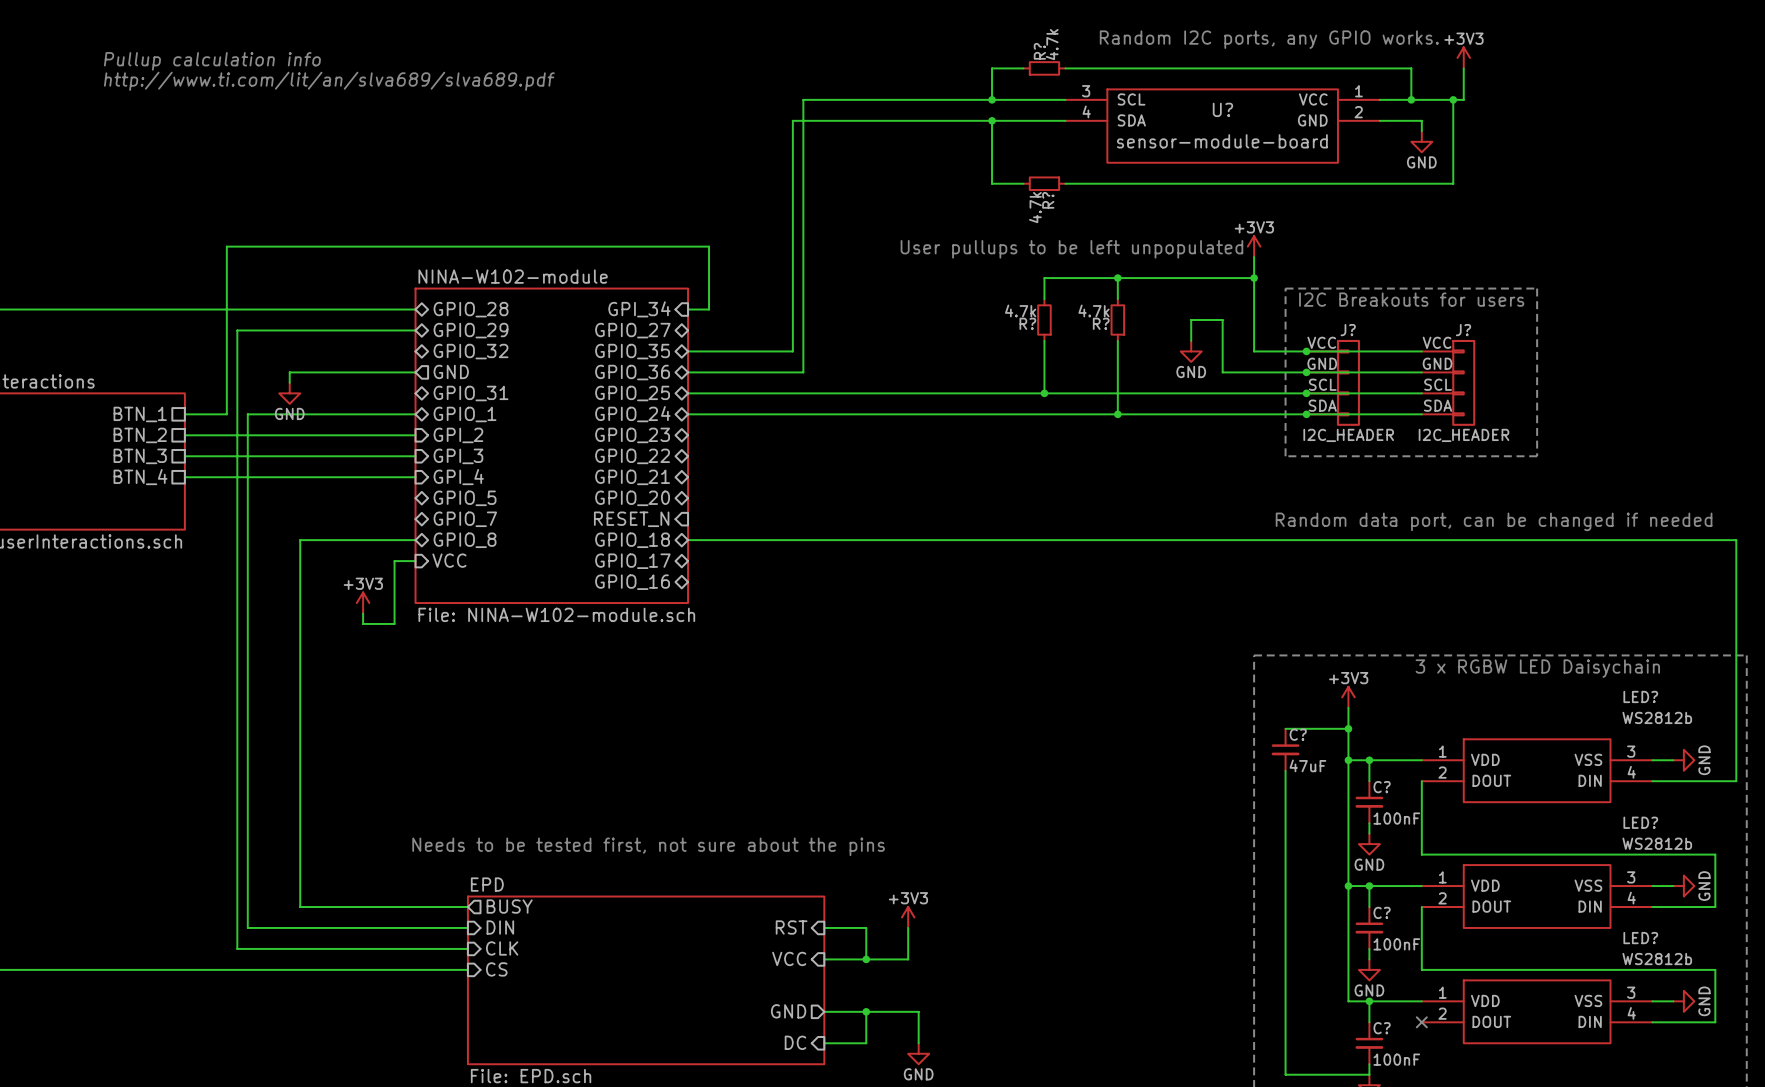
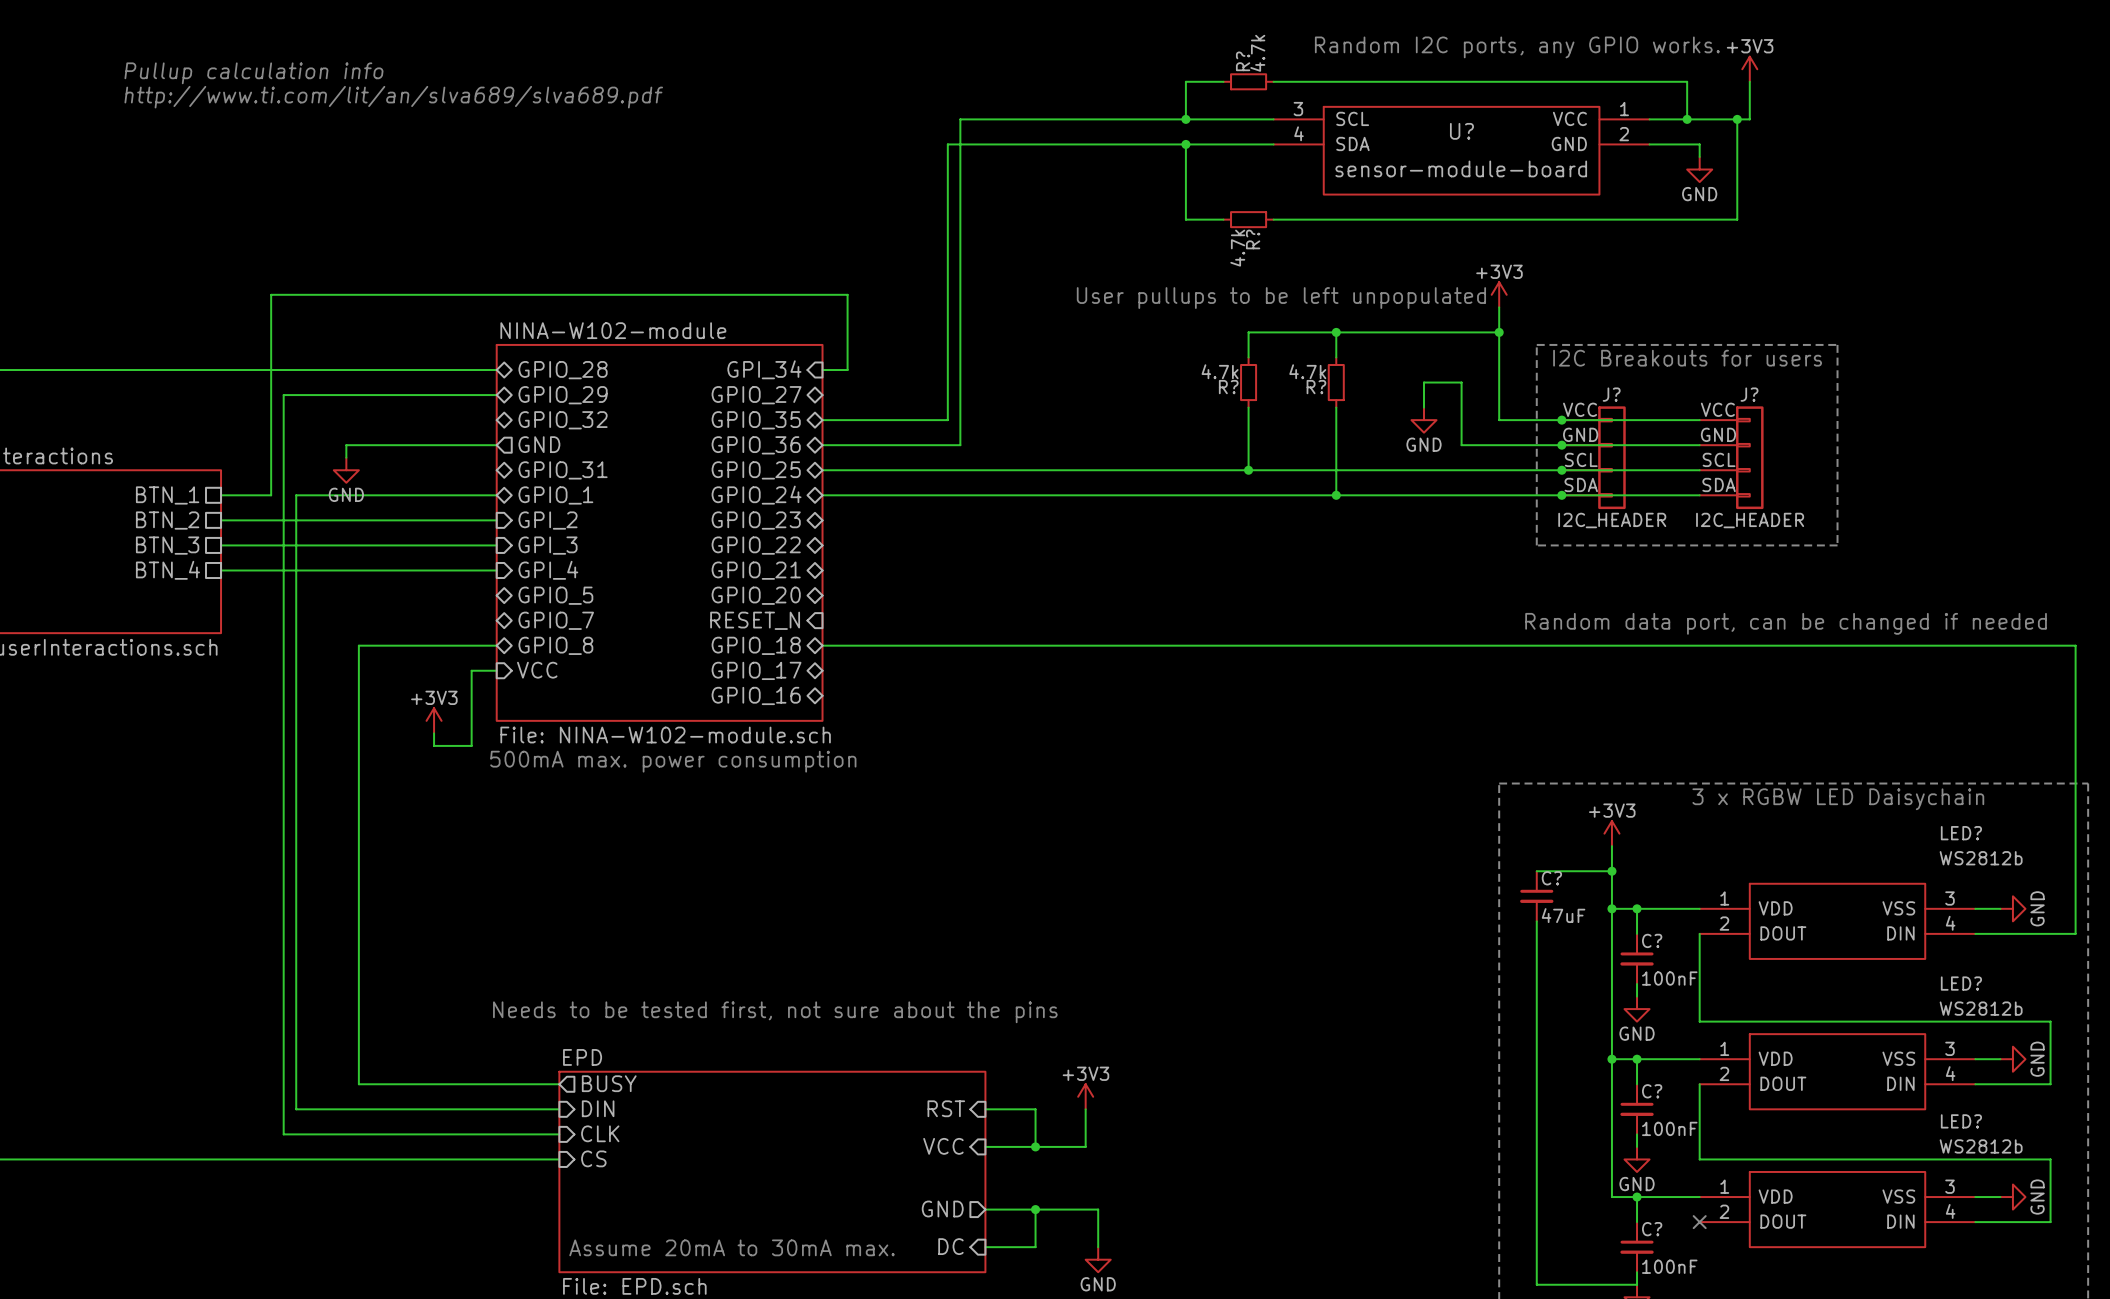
text: none -> 500mA max. power consumption (673, 761)
text: none -> Assume 20mA to 30mA max. (732, 1247)

